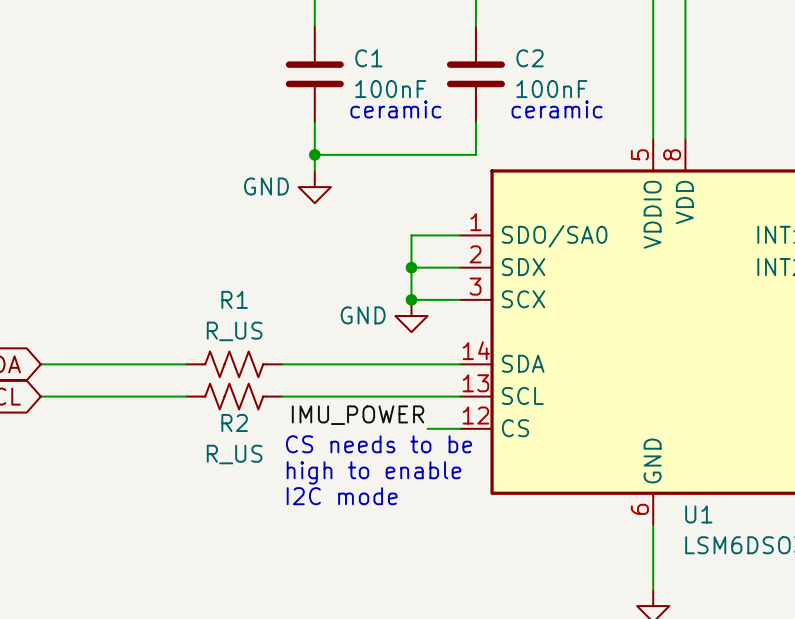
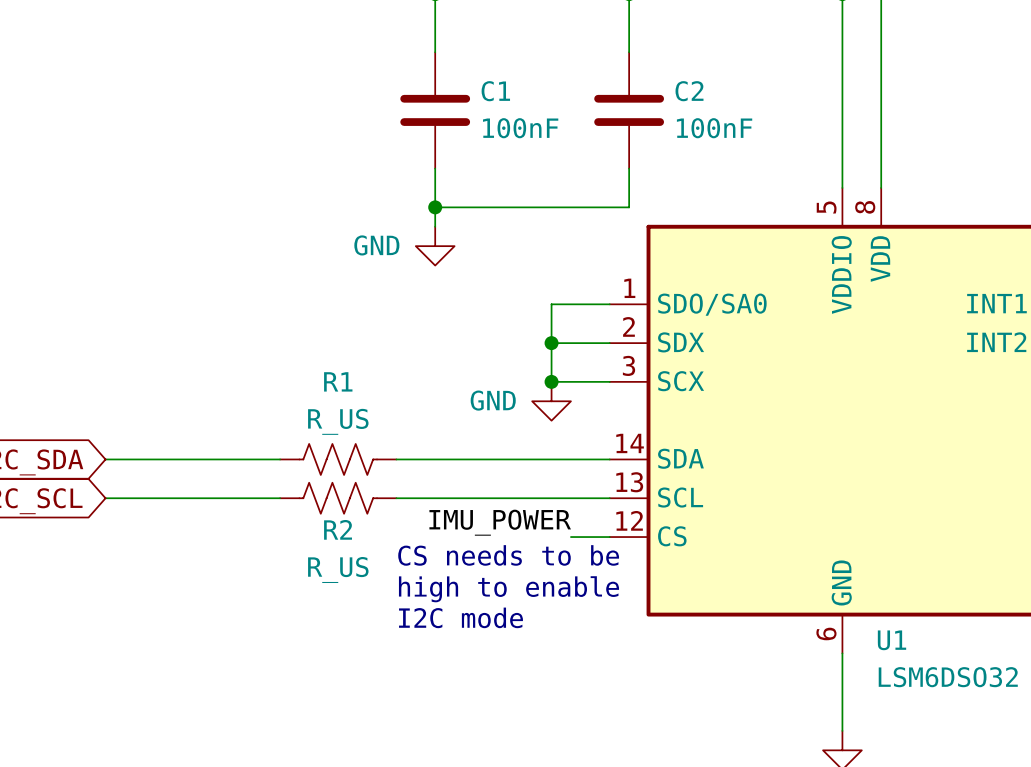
text: ceramic (395, 109) -> none
text: ceramic (557, 109) -> none

